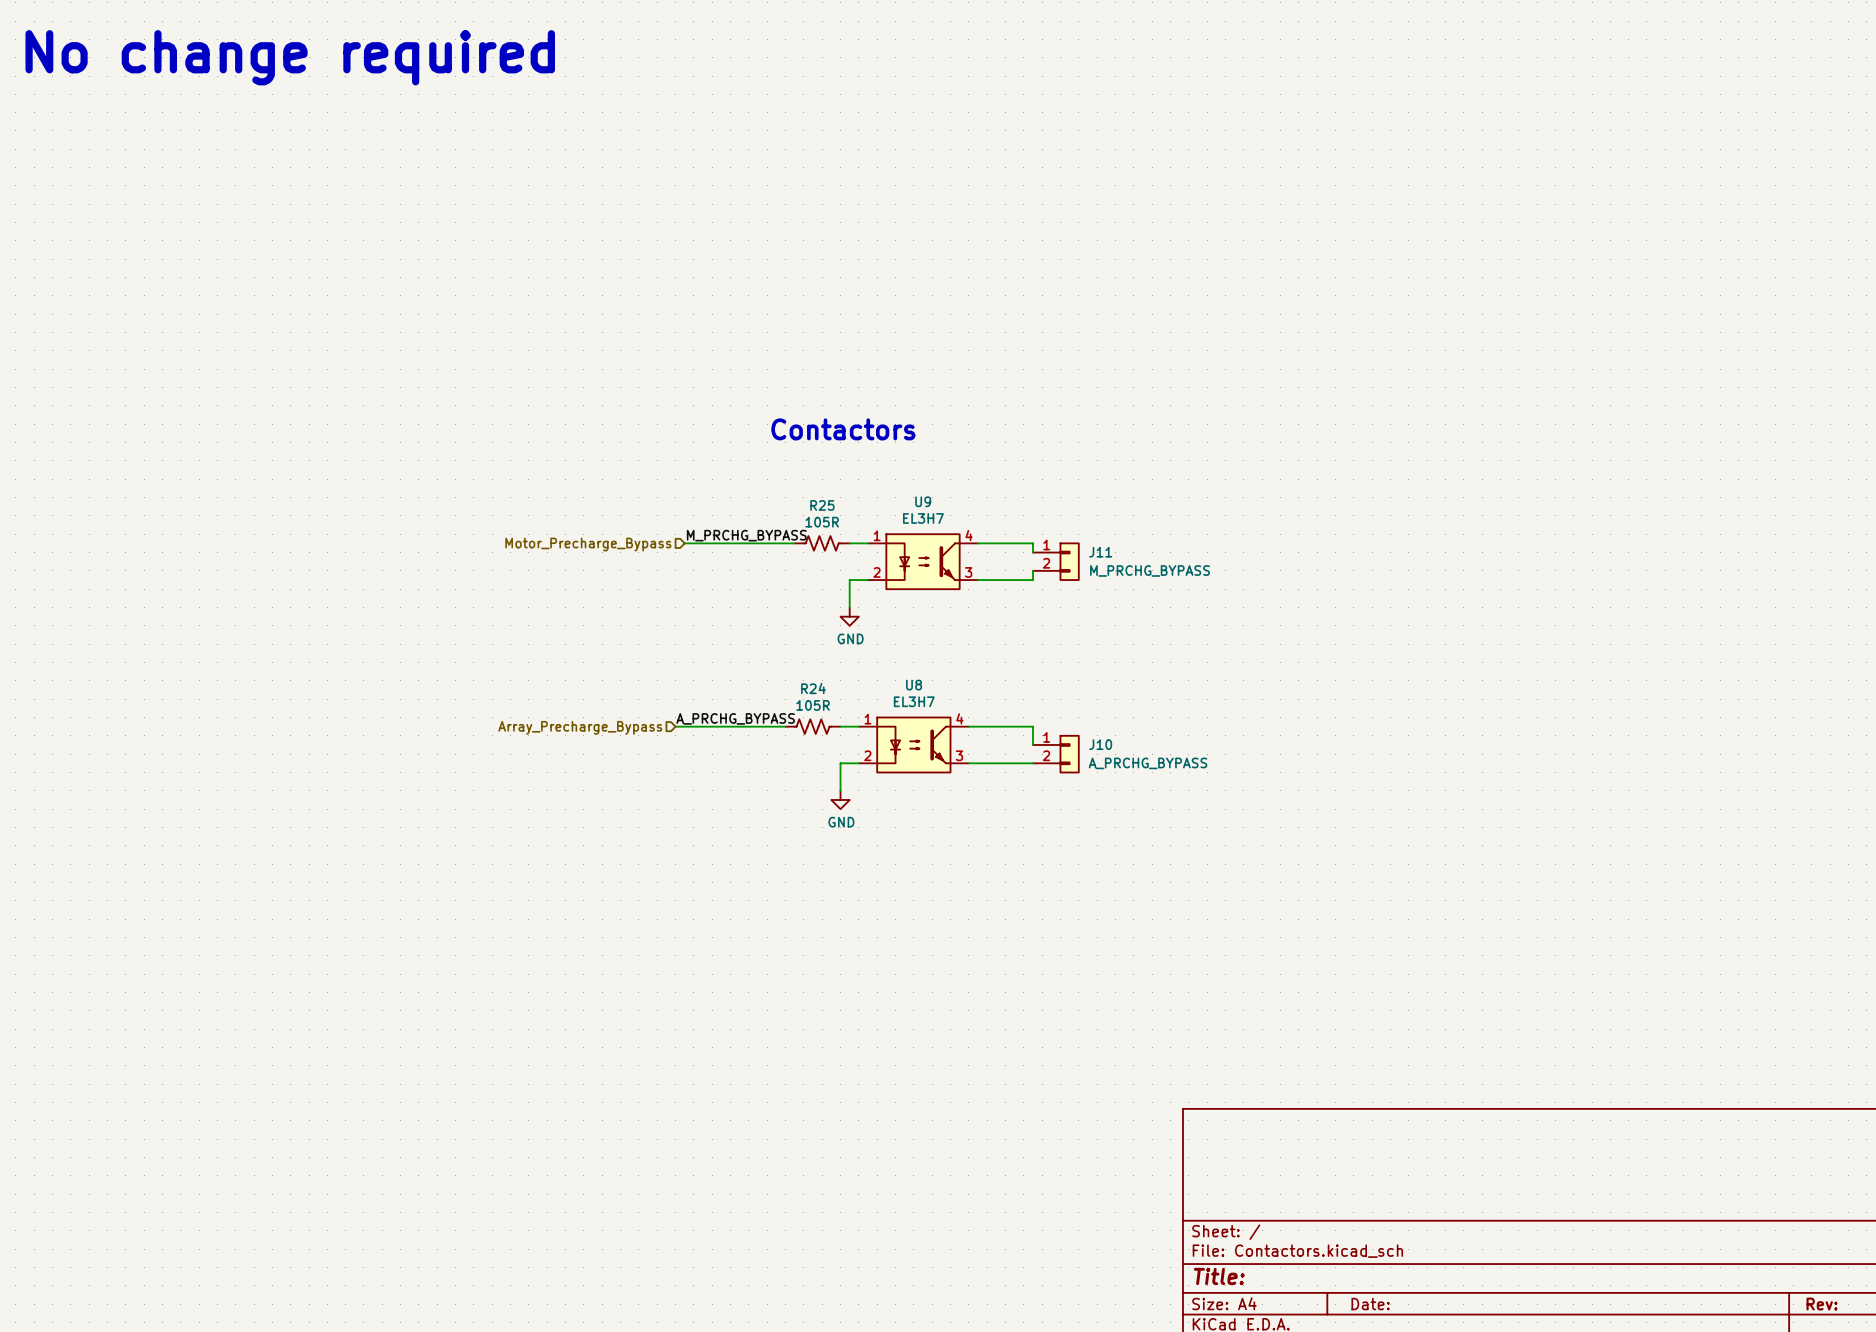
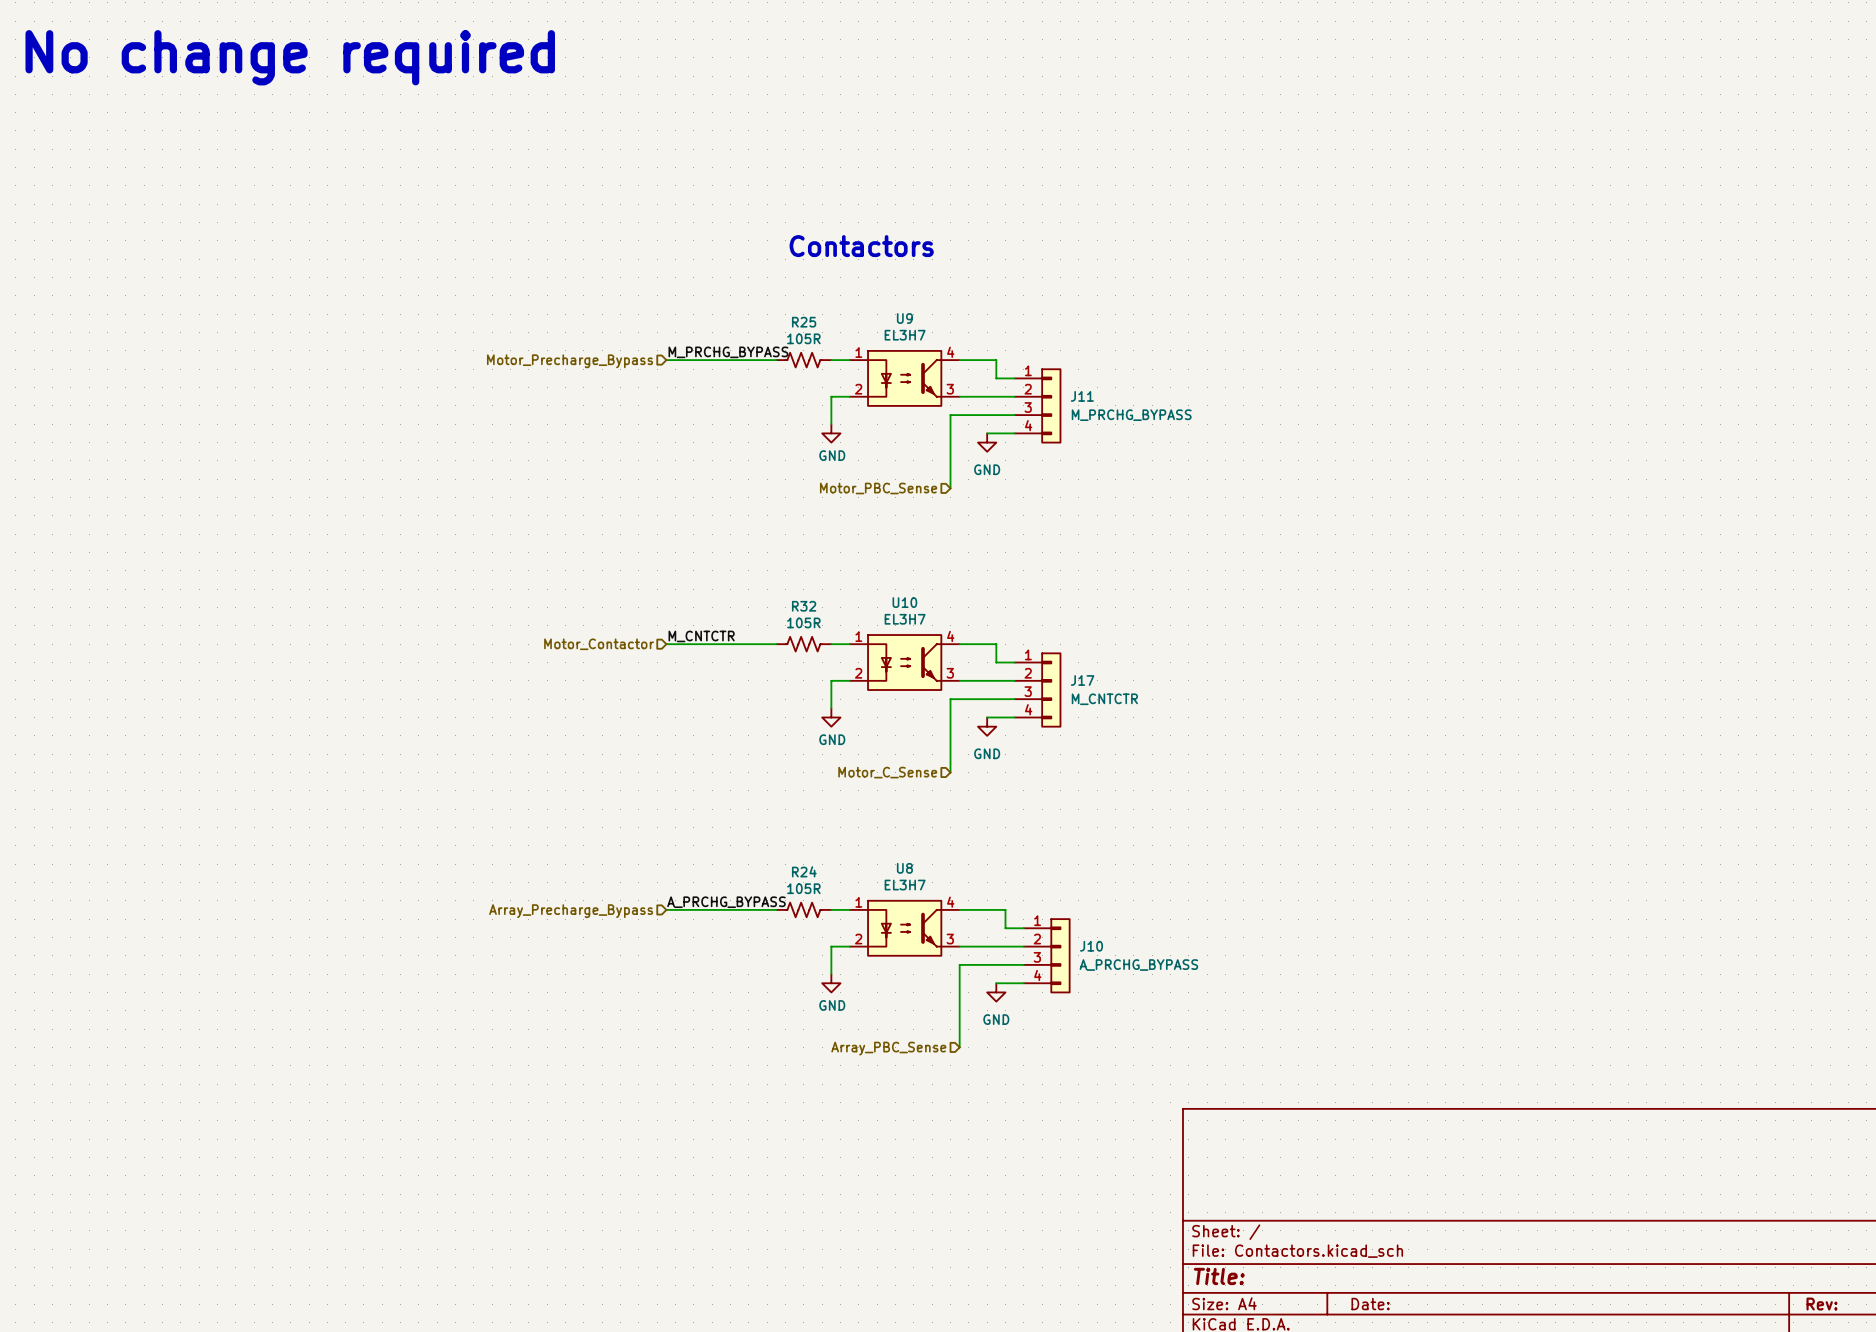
text: none -> Contactors (861, 246)
label: none -> M_PRCHG_BYPASS (728, 352)
wire: none -> (666, 360) (776, 360)
wire: none -> (831, 360) (849, 360)
wire: none -> (959, 360) (996, 360) (996, 378) (1014, 378)
hierarchical label: none -> Motor_Precharge_Bypass (570, 361)
wire: none -> (849, 396) (831, 396) (831, 424)
wire: none -> (959, 396) (1014, 396)
wire: none -> (1014, 415) (950, 415) (950, 488)
text: Contactors (843, 429) -> none
power symbol: none -> GND (831, 433)
wire: none -> (987, 433) (1014, 433)
power symbol: none -> GND (987, 442)
hierarchical label: none -> Motor_PBC_Sense (878, 488)
label: M_PRCHG_BYPASS (746, 535) -> none
J11 symbol: [1032, 542, 1080, 581] -> [1014, 368, 1062, 444]
wire: (684, 543) (794, 543) -> none
R25 position: (822, 543) -> (803, 360)
wire: (849, 543) (868, 543) -> none
wire: (977, 543) (1032, 543) (1032, 552) -> none
hierarchical label: Motor_Precharge_Bypass (588, 544) -> none
U9 position: (923, 561) -> (904, 378)
wire: (1032, 570) (1032, 580) (977, 580) -> none
wire: (868, 580) (849, 580) (849, 607) -> none
power symbol: GND (849, 616) -> none
label: none -> M_CNTCTR (701, 636)
hierarchical label: none -> Motor_Contactor (599, 644)
R32: none -> 105R (803, 644)
wire: none -> (959, 644) (996, 644) (996, 662) (1014, 662)
U10: none -> EL3H7 (904, 662)
wire: none -> (959, 680) (1014, 680)
J17: none -> M_CNTCTR (1038, 690)
wire: none -> (1014, 699) (950, 699) (950, 772)
power symbol: none -> GND (831, 717)
wire: none -> (987, 717) (1014, 717)
label: A_PRCHG_BYPASS (735, 718) -> none
wire: (675, 726) (785, 726) -> (666, 644) (776, 644)
R24 position: (813, 726) -> (803, 909)
wire: (840, 726) (858, 726) -> (831, 644) (849, 644)
wire: (968, 726) (1032, 726) (1032, 744) -> none
power symbol: none -> GND (987, 726)
hierarchical label: Array_Precharge_Bypass (580, 727) -> none
J10 symbol: [1032, 734, 1080, 774] -> [1023, 918, 1071, 994]
U8 position: (913, 744) -> (904, 928)
wire: (858, 763) (840, 763) (840, 790) -> (849, 680) (831, 680) (831, 708)
wire: (968, 763) (1032, 763) -> none
hierarchical label: none -> Motor_C_Sense (887, 772)
power symbol: GND (840, 799) -> none
label: none -> A_PRCHG_BYPASS (726, 902)
wire: none -> (666, 909) (776, 909)
wire: none -> (831, 909) (849, 909)
wire: none -> (959, 909) (1005, 909) (1005, 928) (1023, 928)
hierarchical label: none -> Array_Precharge_Bypass (571, 911)
wire: none -> (849, 946) (831, 946) (831, 974)
wire: none -> (959, 946) (1023, 946)
wire: none -> (1023, 964) (959, 964) (959, 1047)
power symbol: none -> GND (831, 983)
wire: none -> (996, 983) (1023, 983)
power symbol: none -> GND (996, 992)
hierarchical label: none -> Array_PBC_Sense (888, 1048)

